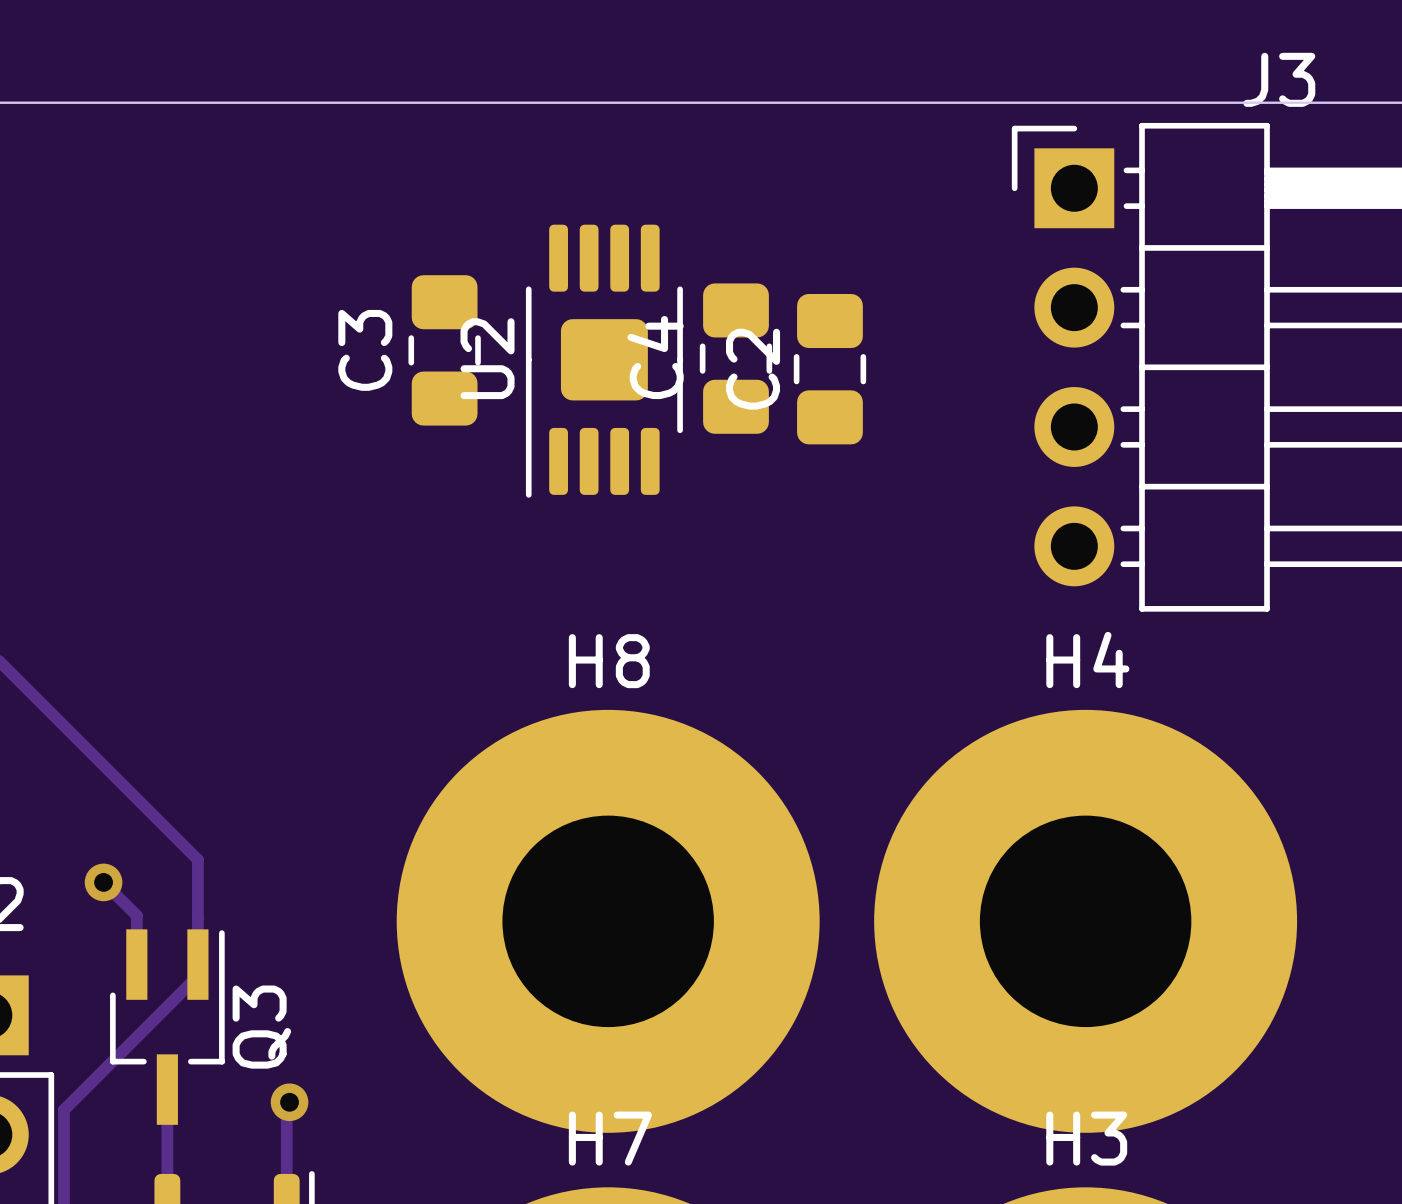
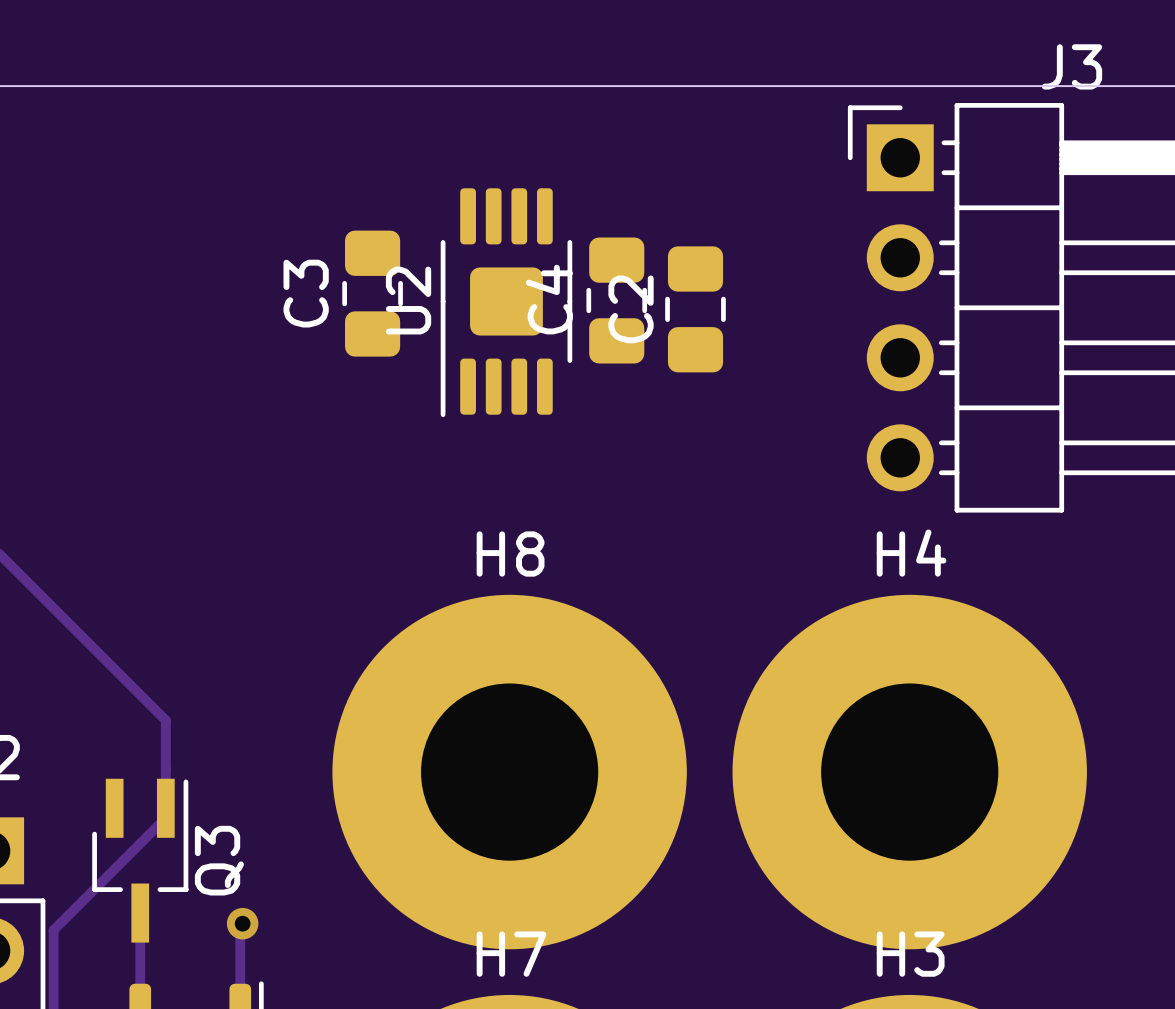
track: (103, 882) (136, 915) (136, 964) -> none
via: (103, 882) -> none

